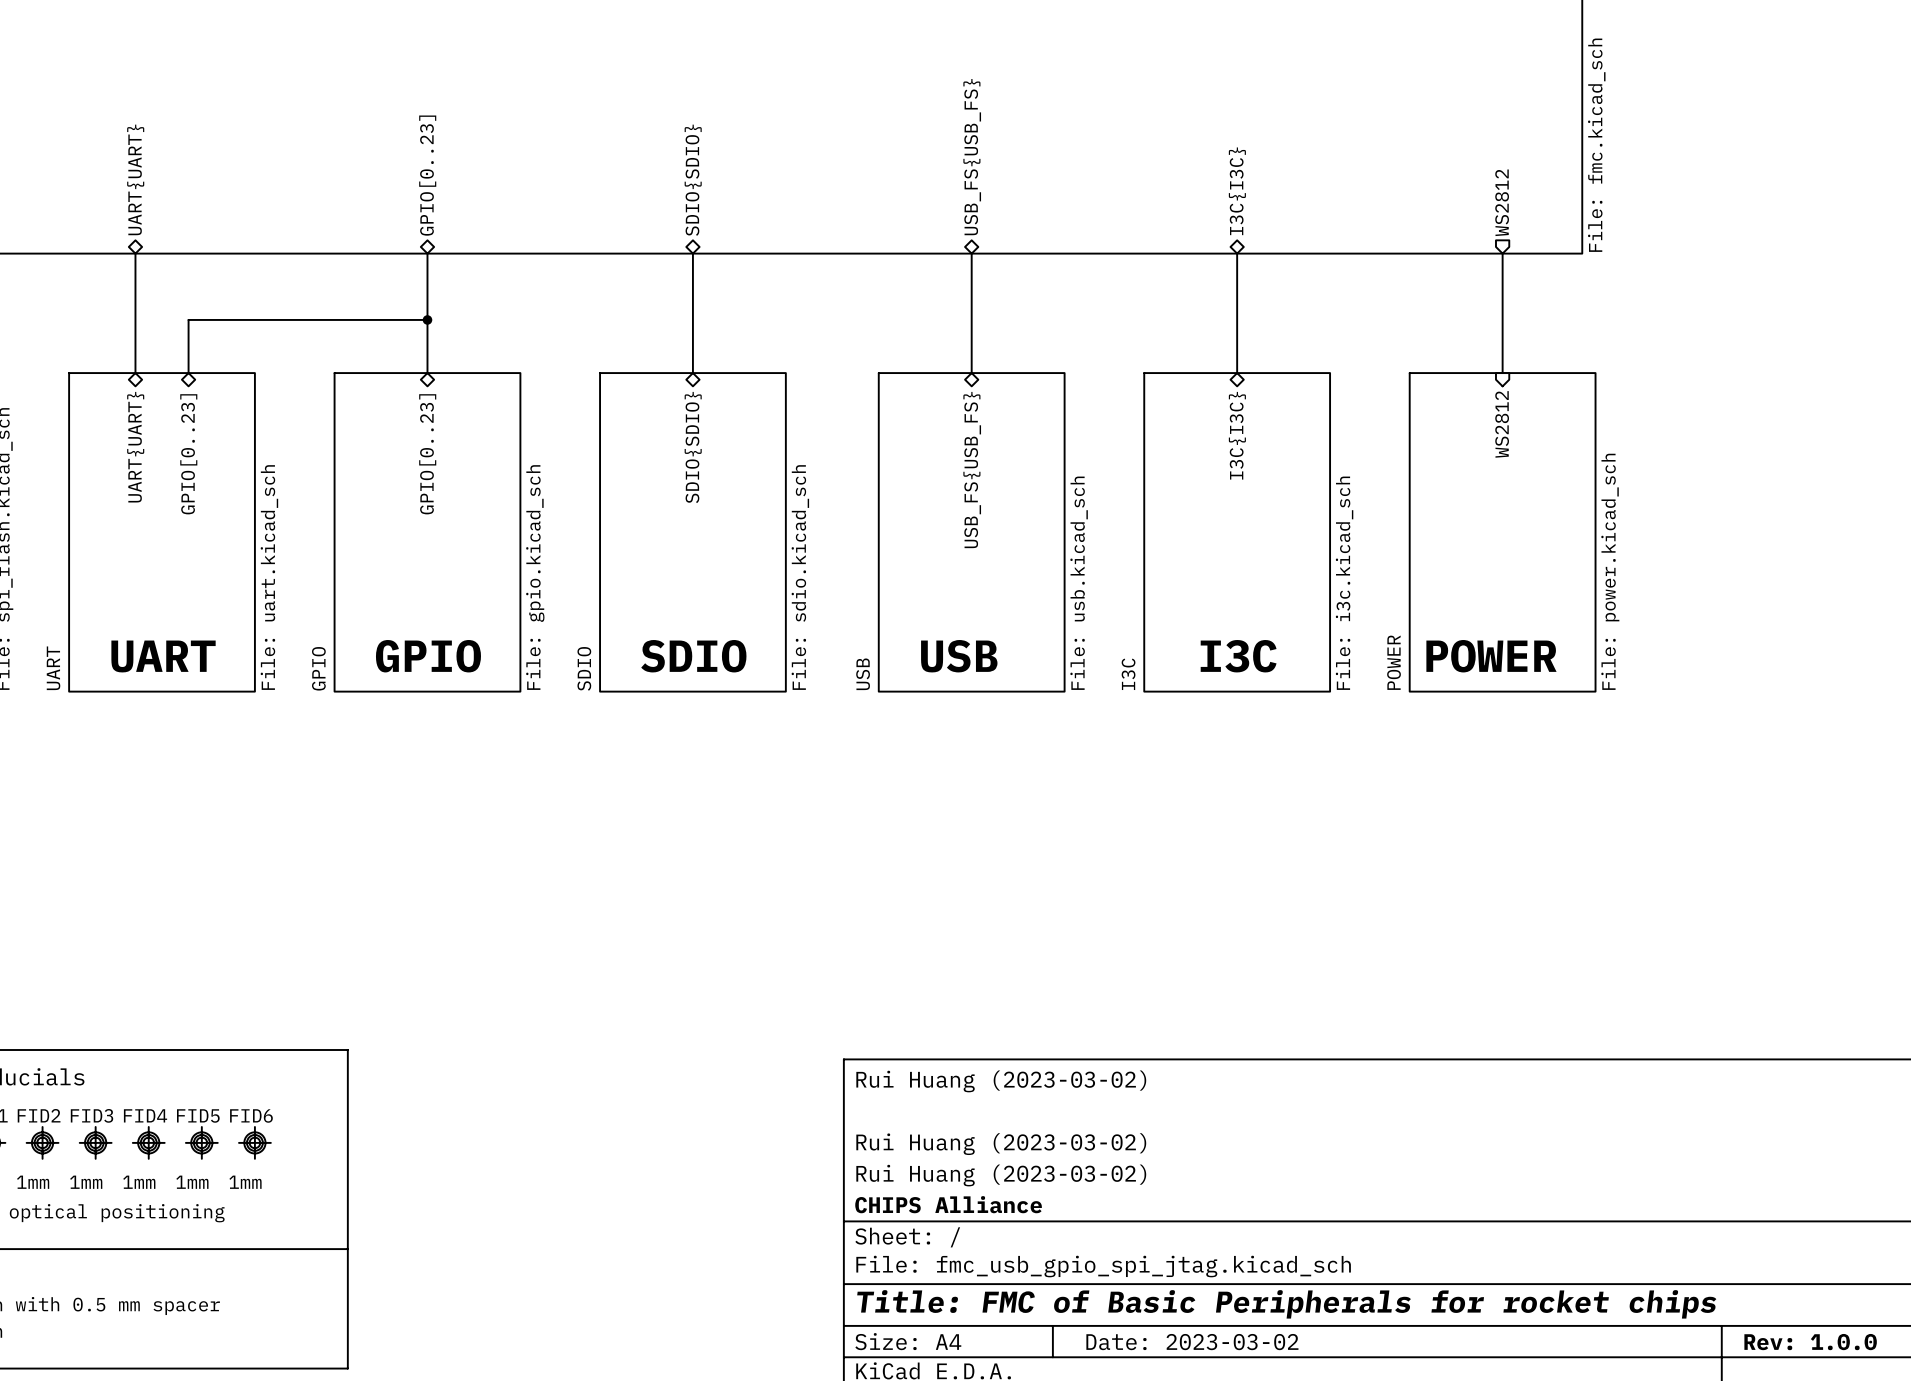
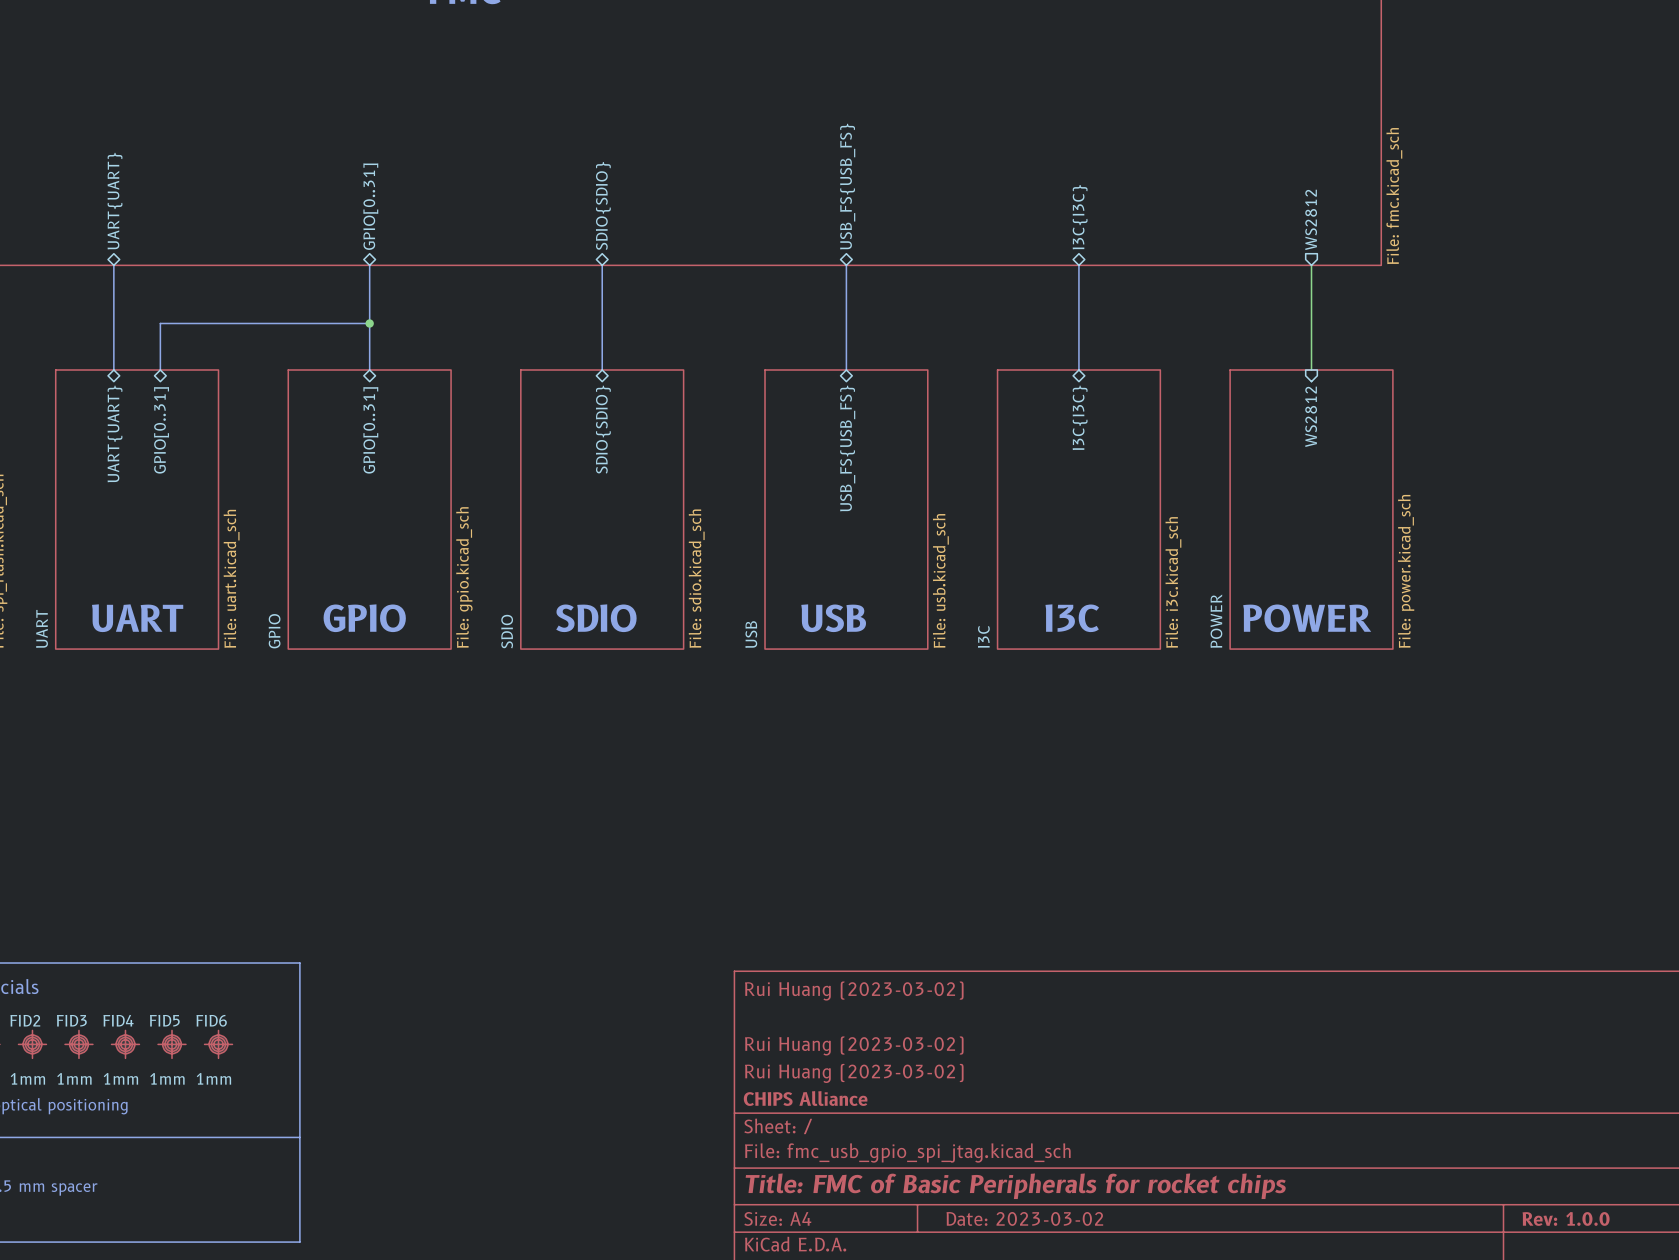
sheet pin: GPIO[0..23] (427, 175) -> GPIO[0..31] (370, 206)
sheet pin: GPIO[0..23] (188, 454) -> GPIO[0..31] (161, 430)
sheet pin: GPIO[0..23] (427, 454) -> GPIO[0..31] (370, 430)

